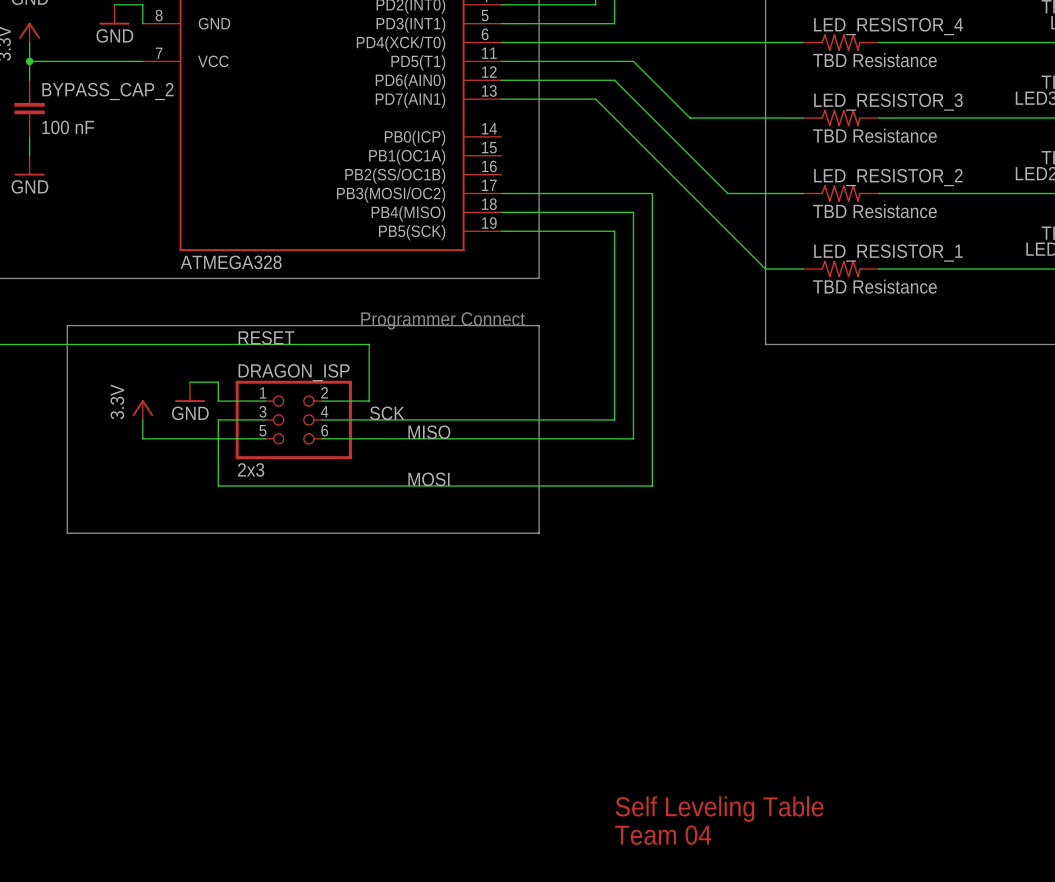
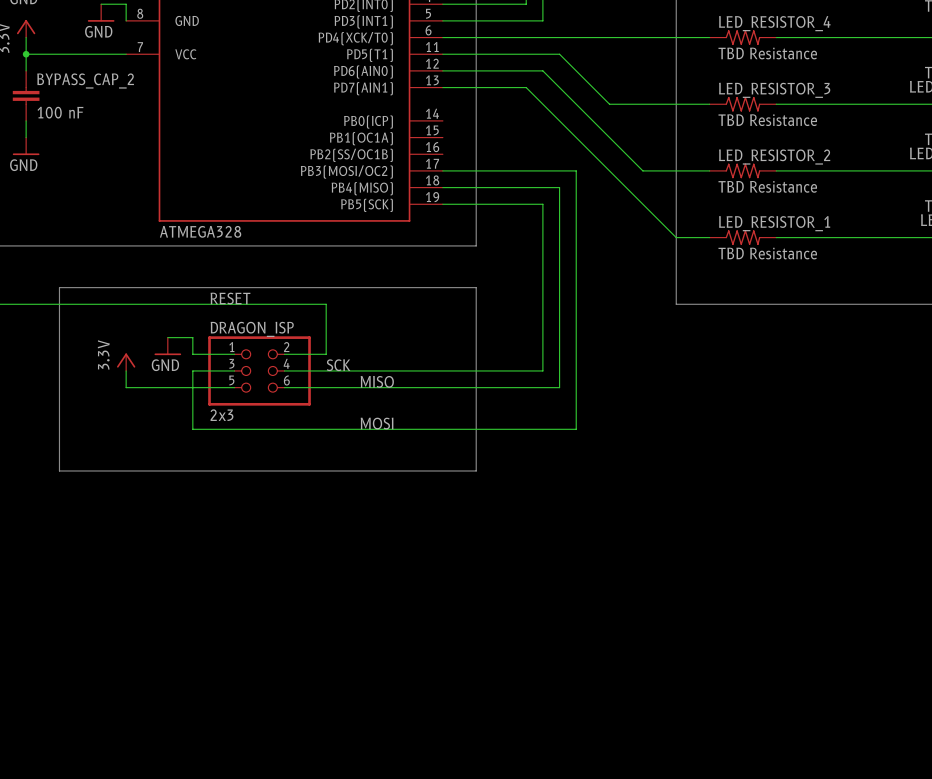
text: Programmer Connect (443, 320) -> none
text: Self Leveling Table (719, 809) -> none
text: Team 04 (663, 835) -> none

